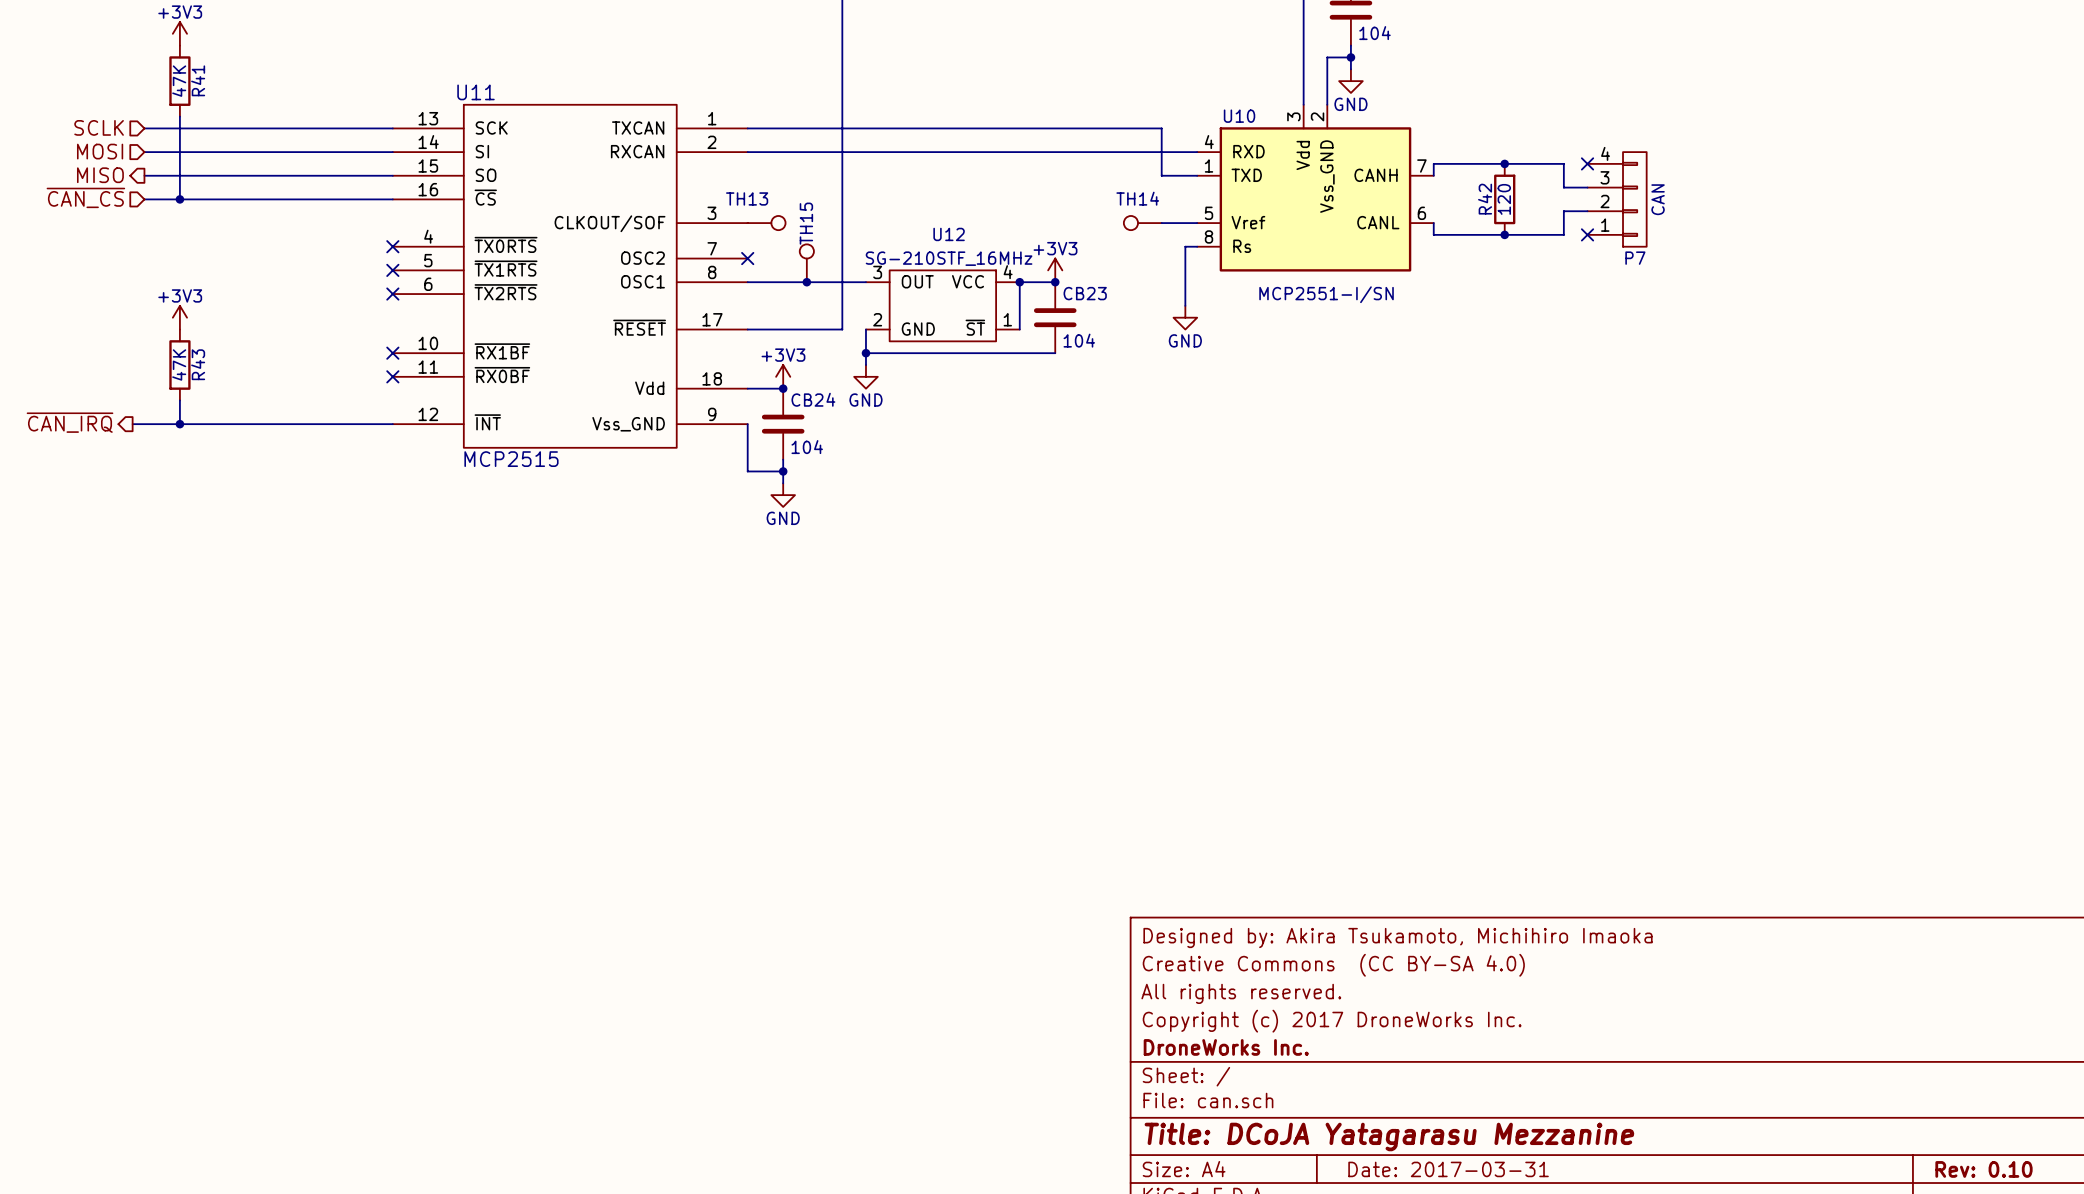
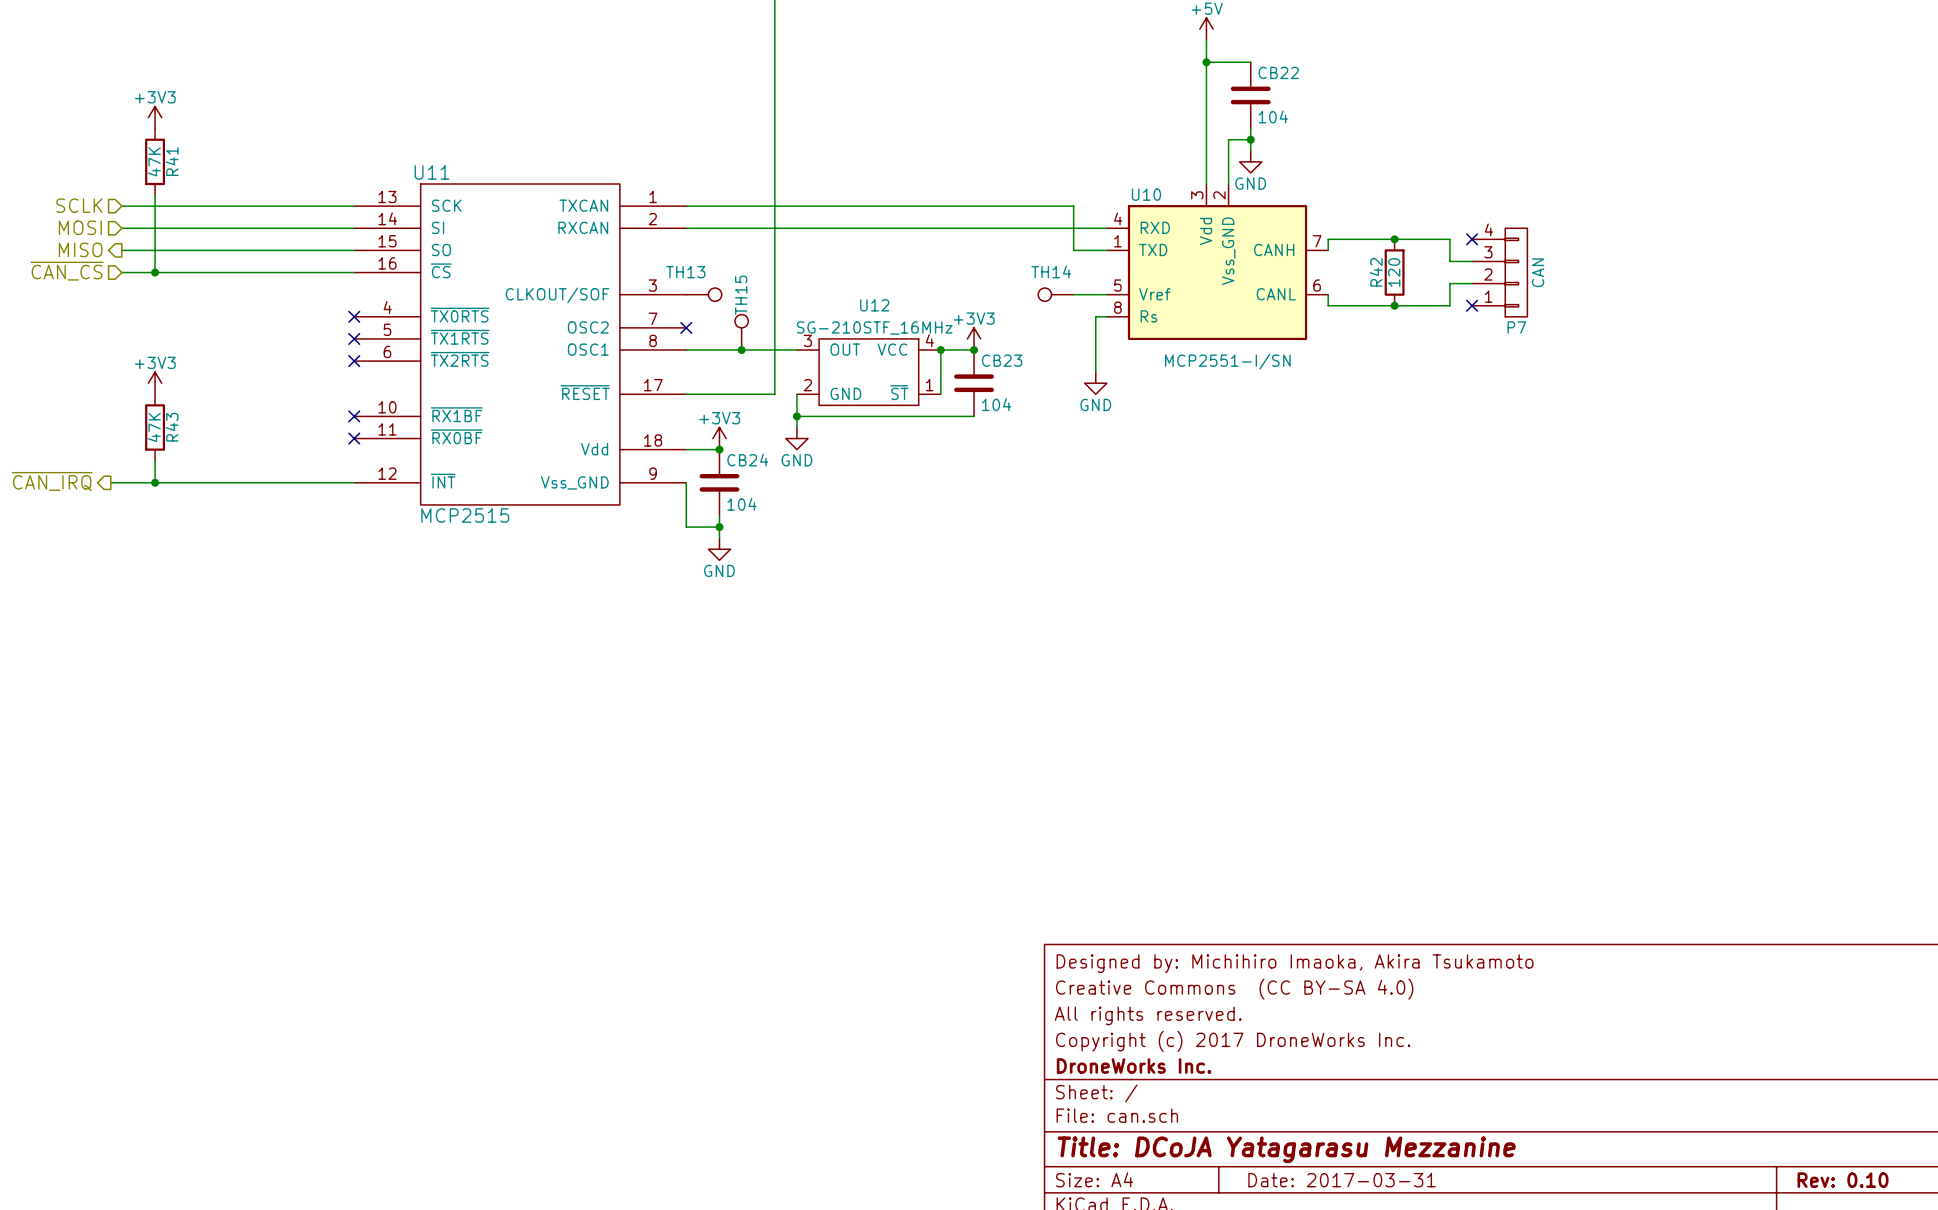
title block: Designed by: Akira Tsukamoto, Michihiro Imaoka (1397, 937) -> Designed by: Michihiro Imaoka, Akira Tsukamoto (1295, 963)

